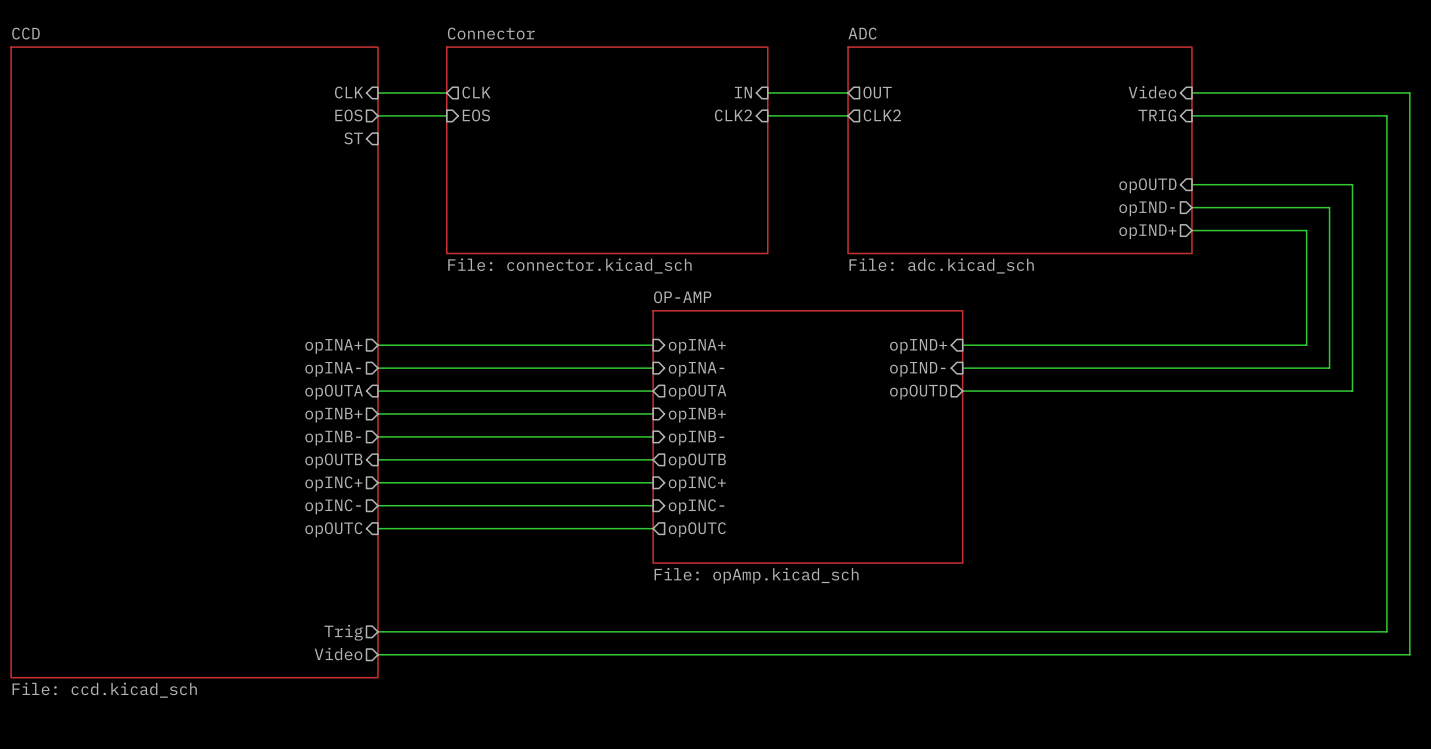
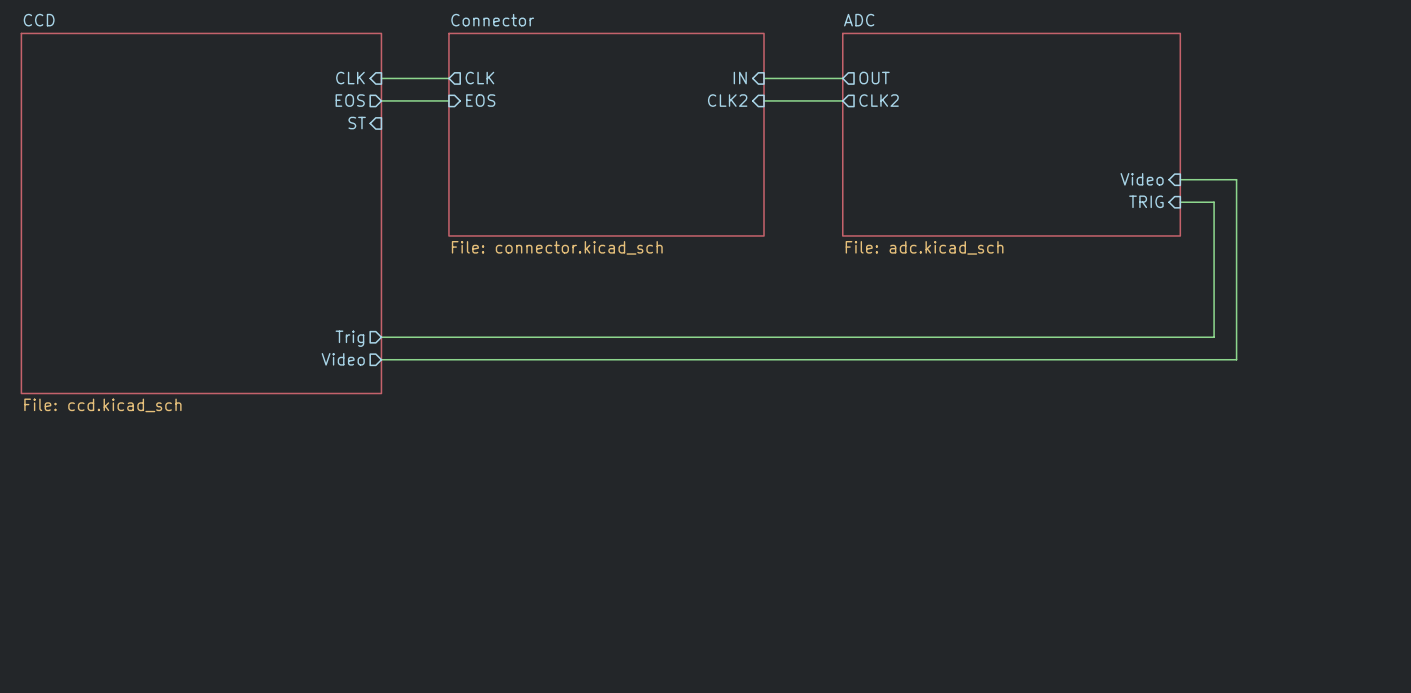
sheet pin position: Video (1152, 92) -> Video (1142, 179)
wire: (1191, 92) (1409, 92) (1409, 654) (377, 654) -> none
sheet pin position: TRIG (1157, 115) -> TRIG (1146, 201)
wire: (1191, 115) (1386, 115) (1386, 631) (377, 631) -> none
wire: (1191, 184) (1352, 184) (1352, 391) (962, 391) -> none
sheet pin: opOUTD (1147, 185) -> none
wire: none -> (1180, 179) (1236, 179) (1236, 359) (381, 359)
wire: (1191, 207) (1329, 207) (1329, 368) (962, 368) -> none
sheet pin: opIND- (1147, 208) -> none
wire: none -> (1180, 202) (1214, 202) (1214, 337) (381, 337)
sheet CCD: none -> File: ccd.kicad_sch (201, 213)
wire: (1191, 230) (1306, 230) (1306, 345) (962, 345) -> none
sheet pin: opIND+ (1147, 231) -> none
wire: (377, 345) (653, 345) -> none
sheet pin: opINA+ (333, 346) -> none
sheet pin: opINA+ (697, 346) -> none
sheet pin: opIND+ (918, 346) -> none
sheet pin: none -> Trig (349, 338)
sheet CCD: File: ccd.kicad_sch (194, 362) -> none
wire: (377, 368) (653, 368) -> none
sheet pin: opINA- (333, 369) -> none
sheet pin: opINA- (696, 369) -> none
sheet pin: opIND- (917, 369) -> none
sheet pin: none -> Video (343, 359)
wire: (377, 391) (653, 391) -> none
sheet pin: opOUTA (334, 392) -> none
sheet pin: opOUTA (697, 392) -> none
sheet pin: opOUTD (918, 392) -> none
wire: (377, 414) (653, 414) -> none
sheet pin: opINB+ (333, 415) -> none
sheet pin: opINB+ (697, 415) -> none
wire: (377, 436) (653, 436) -> none
sheet OP-AMP: File: opAmp.kicad_sch (807, 436) -> none
sheet pin: opINB- (333, 438) -> none
sheet pin: opINB- (696, 438) -> none
wire: (377, 459) (653, 459) -> none
sheet pin: opOUTB (333, 460) -> none
sheet pin: opOUTB (697, 460) -> none
wire: (377, 482) (653, 482) -> none
sheet pin: opINC+ (333, 483) -> none
sheet pin: opINC+ (697, 483) -> none
wire: (377, 505) (653, 505) -> none
sheet pin: opINC- (333, 506) -> none
sheet pin: opINC- (696, 506) -> none
wire: (377, 528) (653, 528) -> none
sheet pin: opOUTC (333, 529) -> none
sheet pin: opOUTC (697, 529) -> none
sheet pin: Trig (343, 632) -> none
sheet pin: Video (338, 654) -> none

